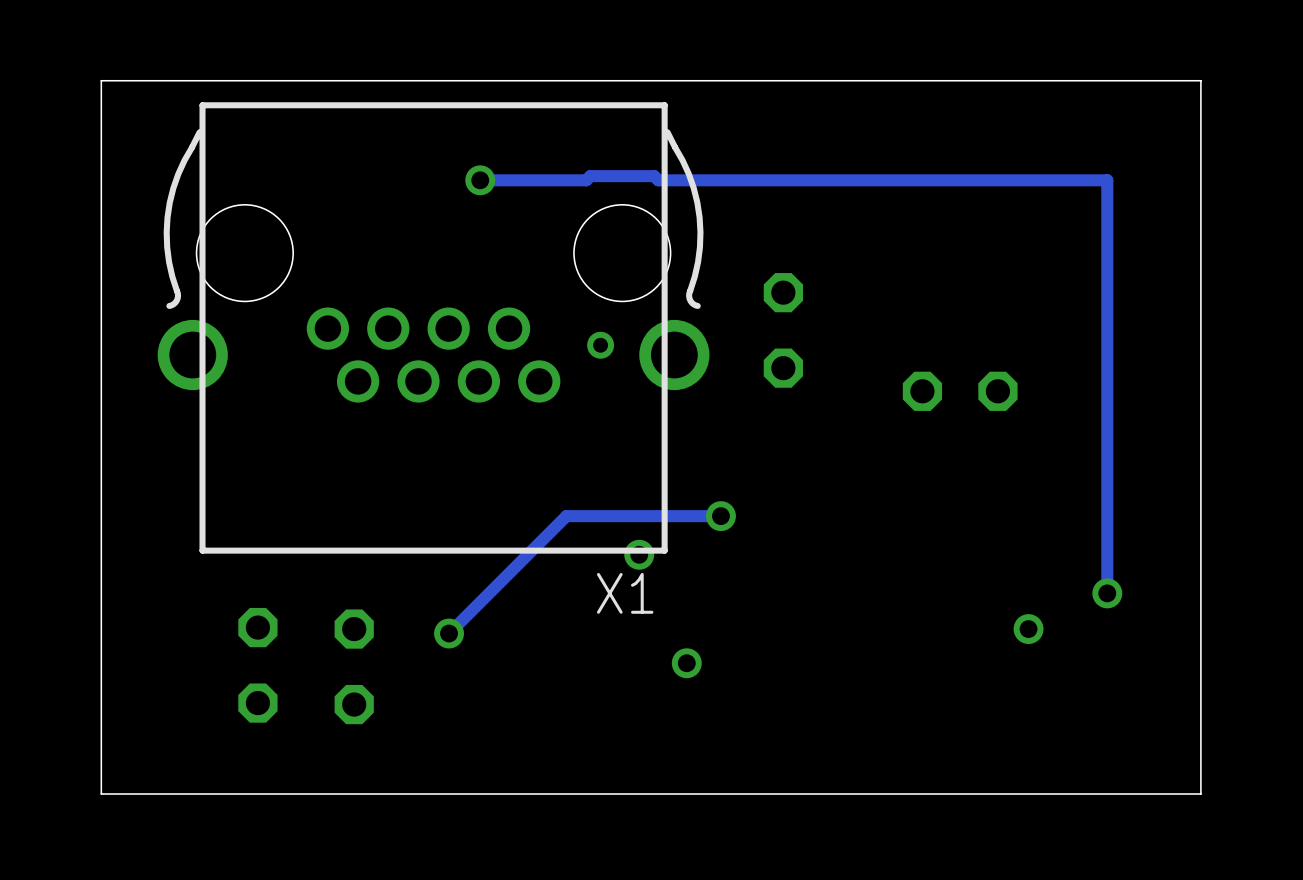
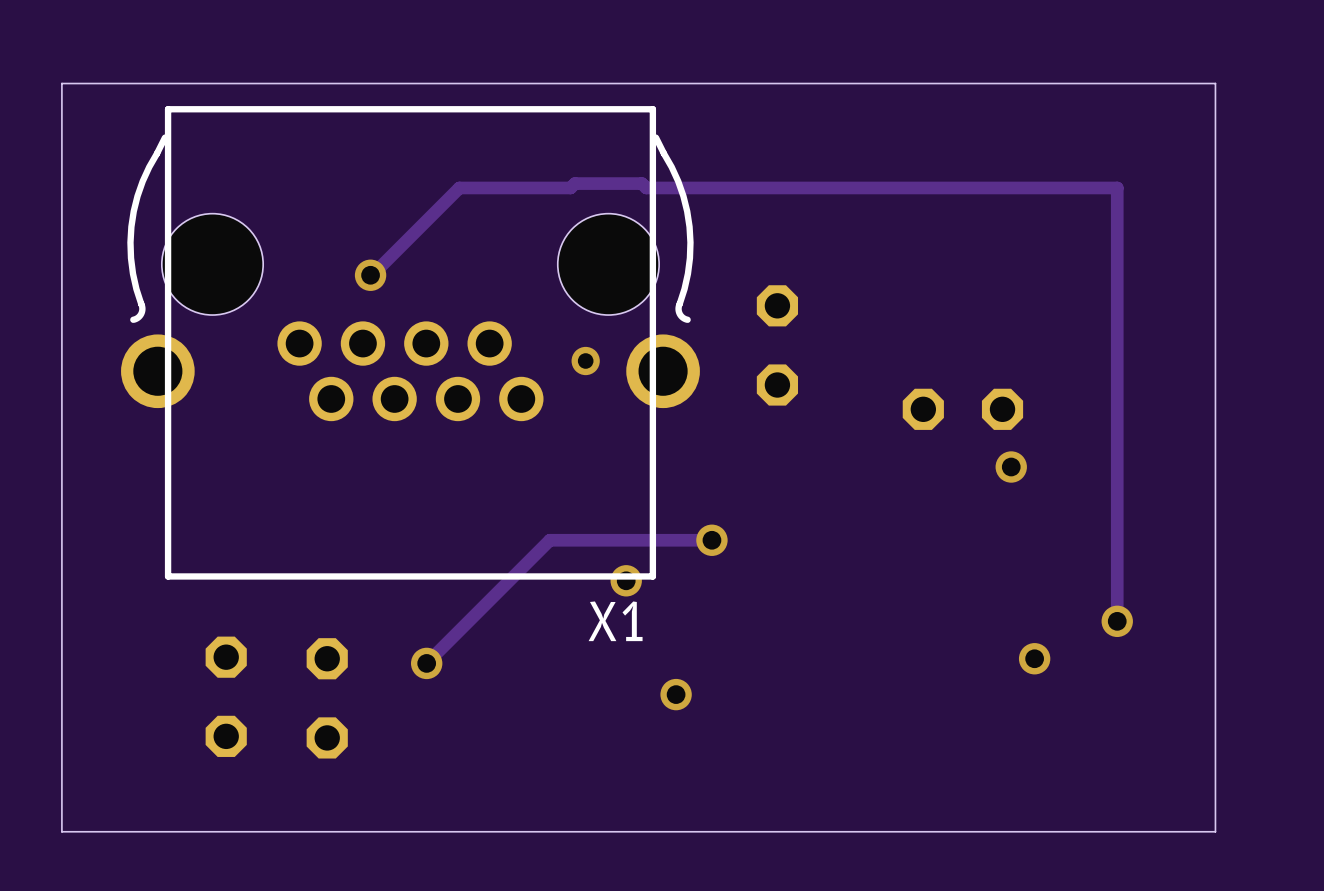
track: none -> (459, 187) (370, 275)
via position: (480, 180) -> (370, 275)
via: none -> (1011, 467)

